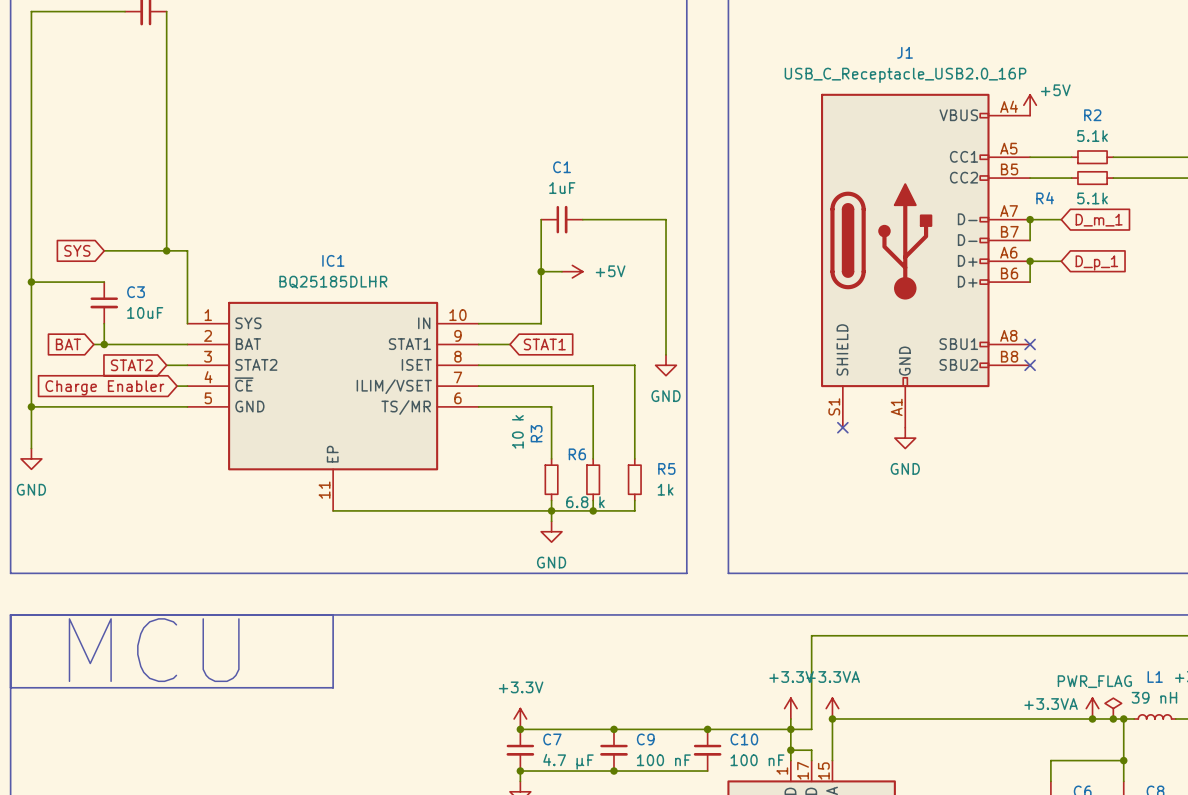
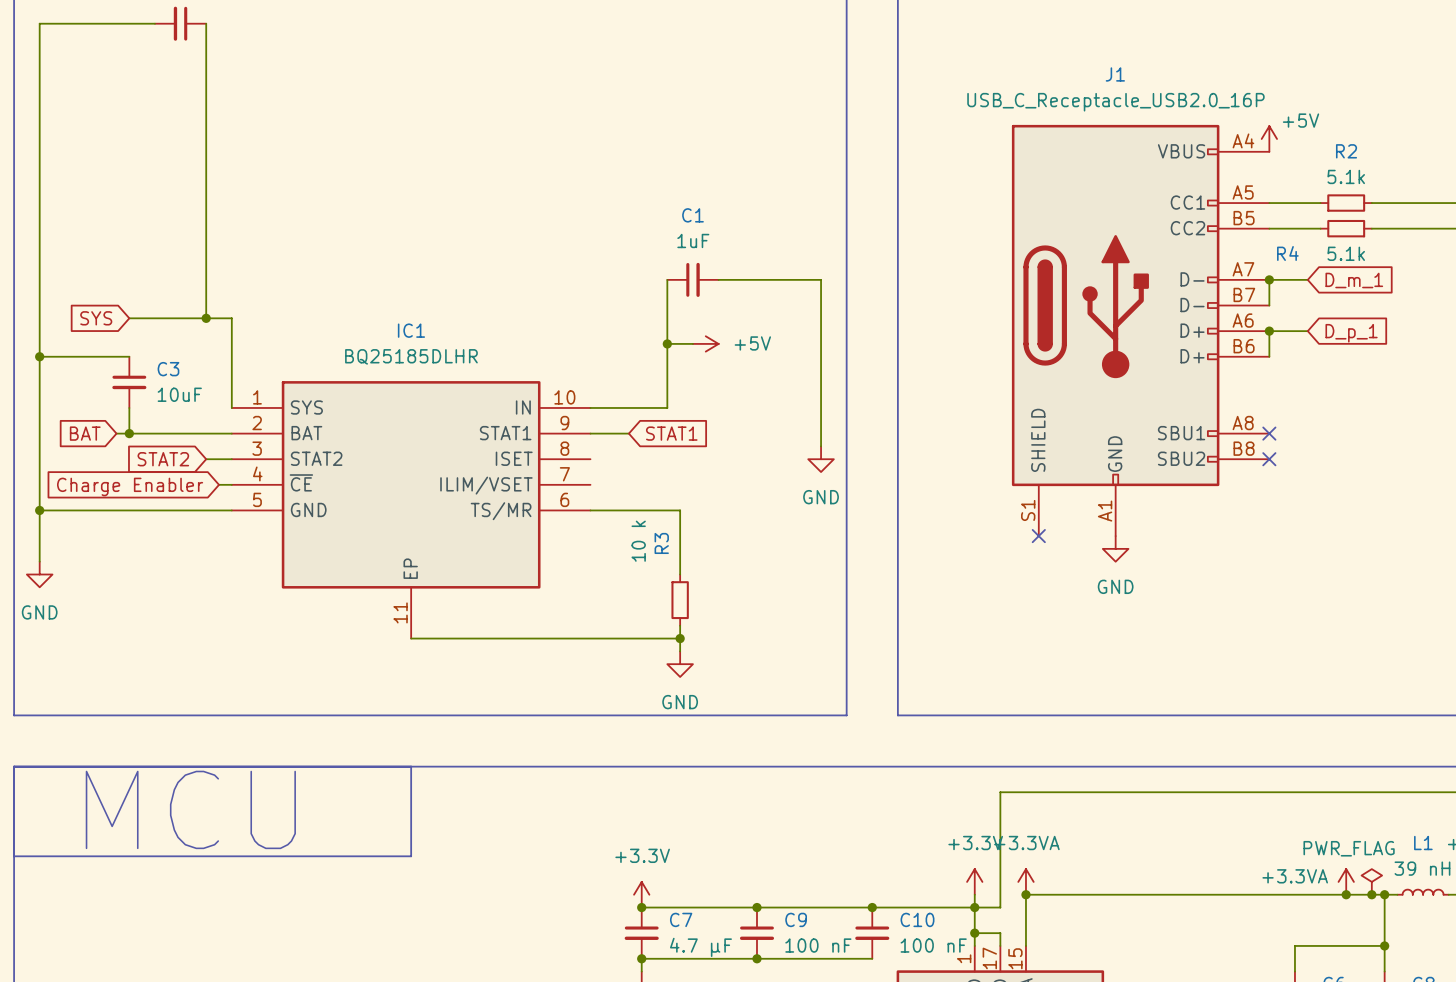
wire: (478, 365) (634, 365) (634, 458) -> none
wire: (478, 386) (593, 386) (593, 458) -> none
R6: 6.8 k (593, 479) -> none
R5: 1k (634, 479) -> none
wire: (593, 500) (593, 510) -> none
wire: (634, 500) (634, 510) (551, 510) -> none
junction: (593, 510) -> none

